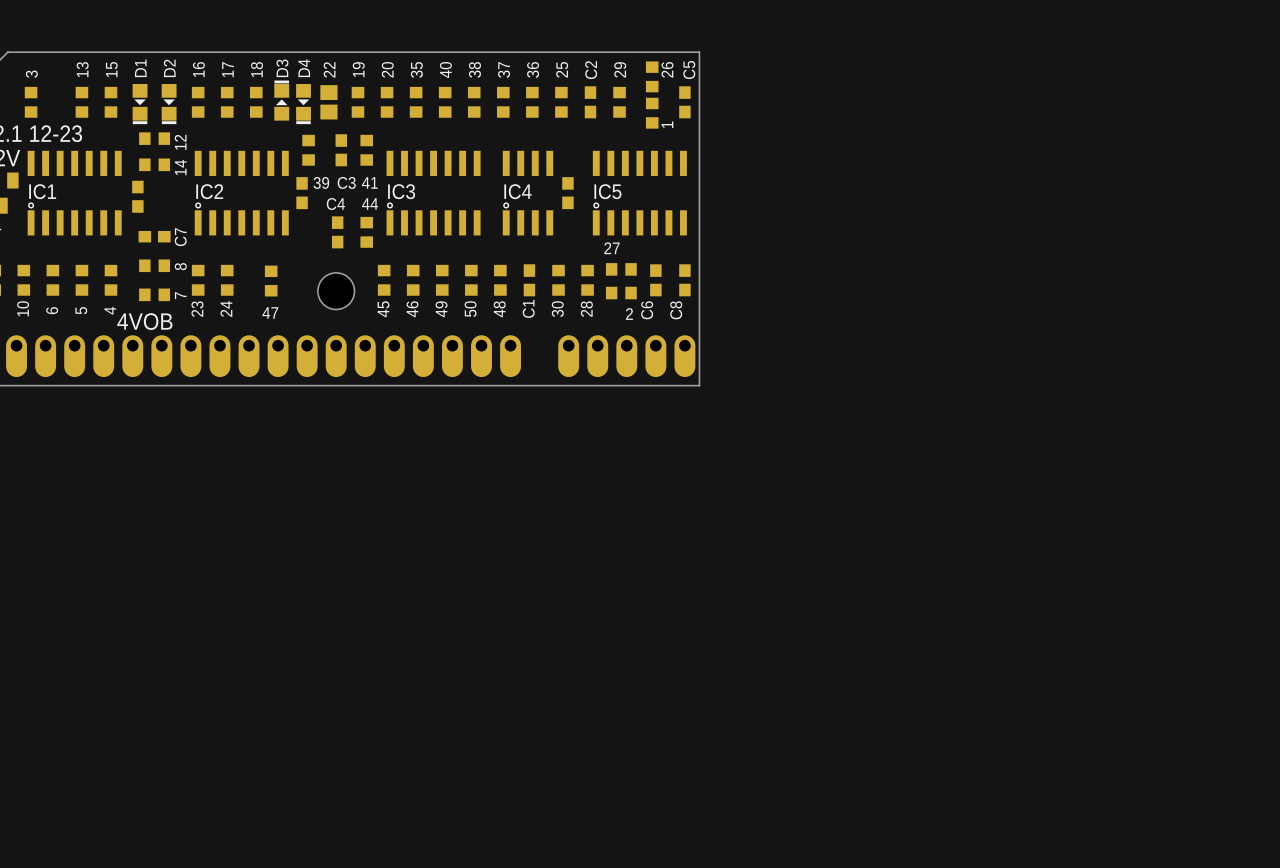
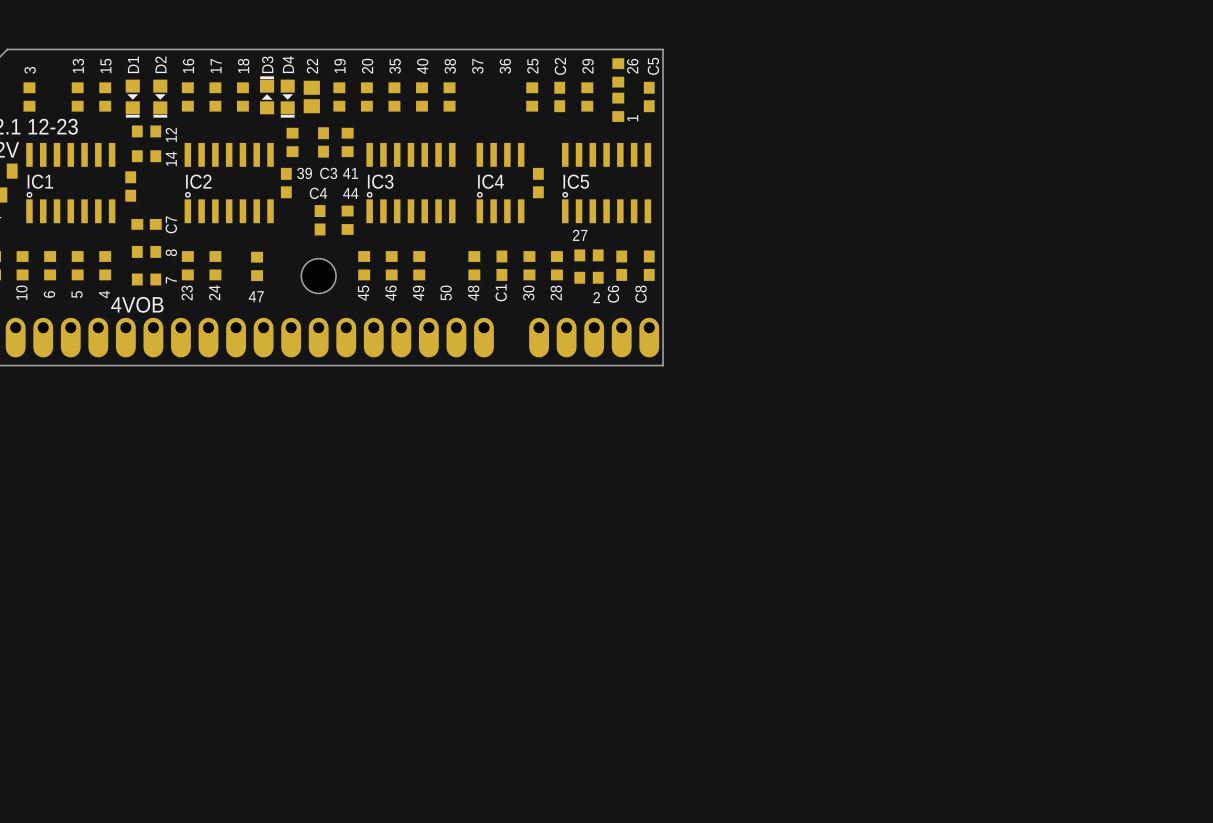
part: (503, 102) -> none
part: (532, 102) -> none
part: (471, 280) -> none

